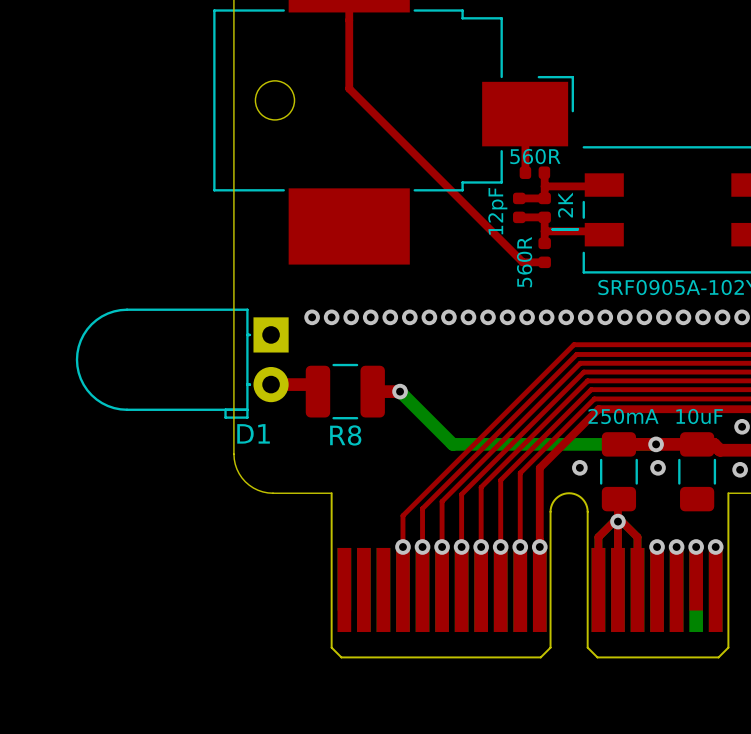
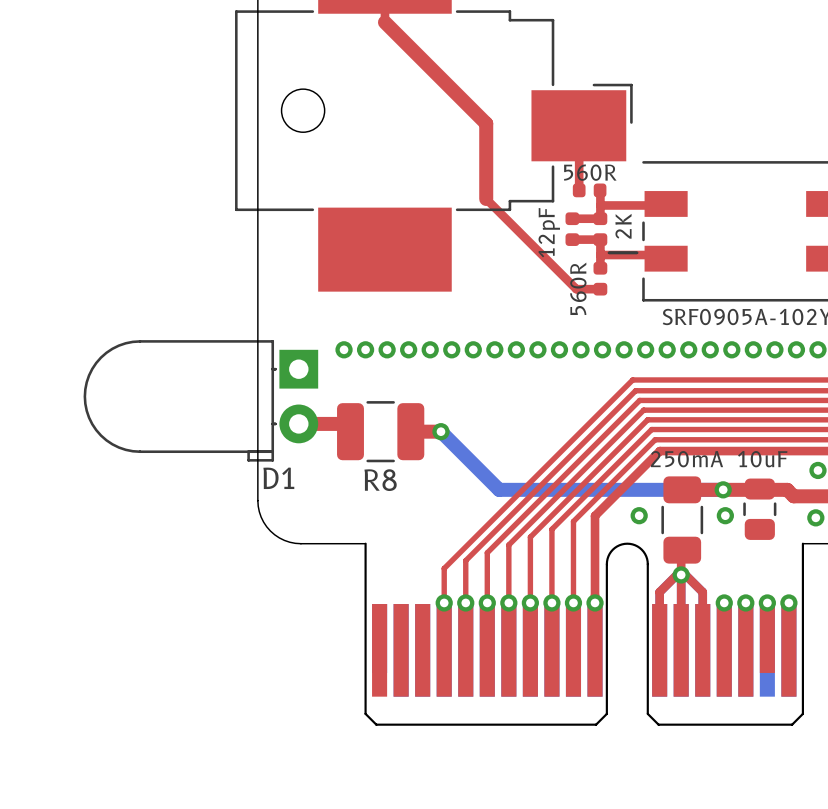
top track: (349, 20) (349, 88) (441, 180) -> (384, 22) (486, 123) (486, 199)
part footprint: [678, 432, 717, 512] -> [743, 478, 777, 540]

